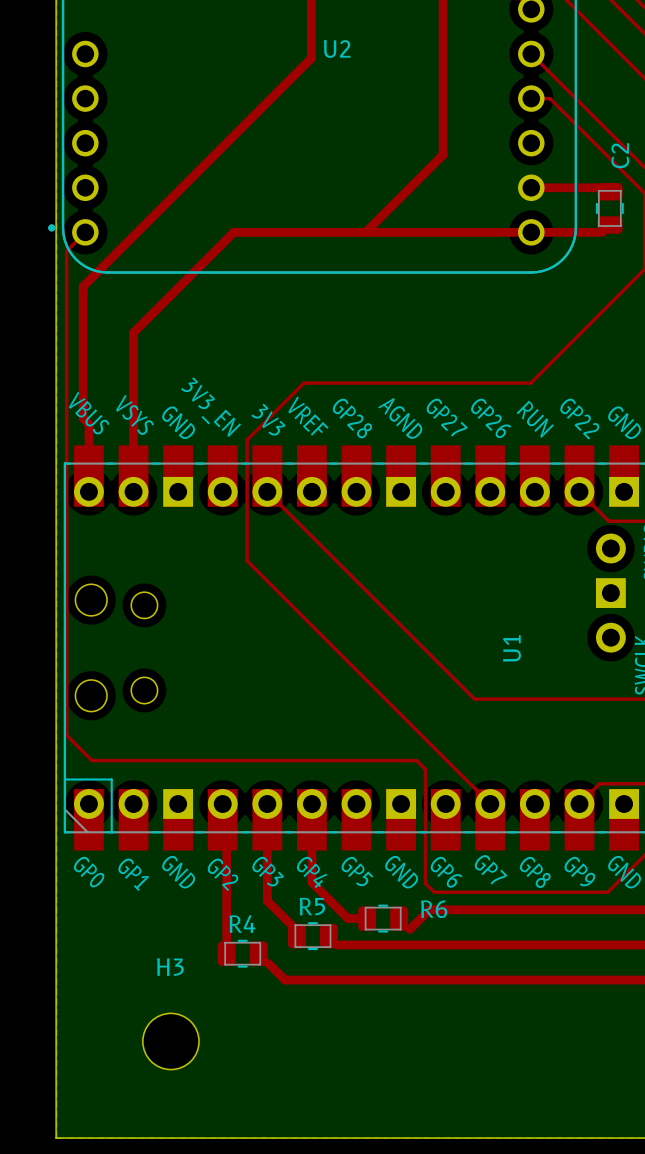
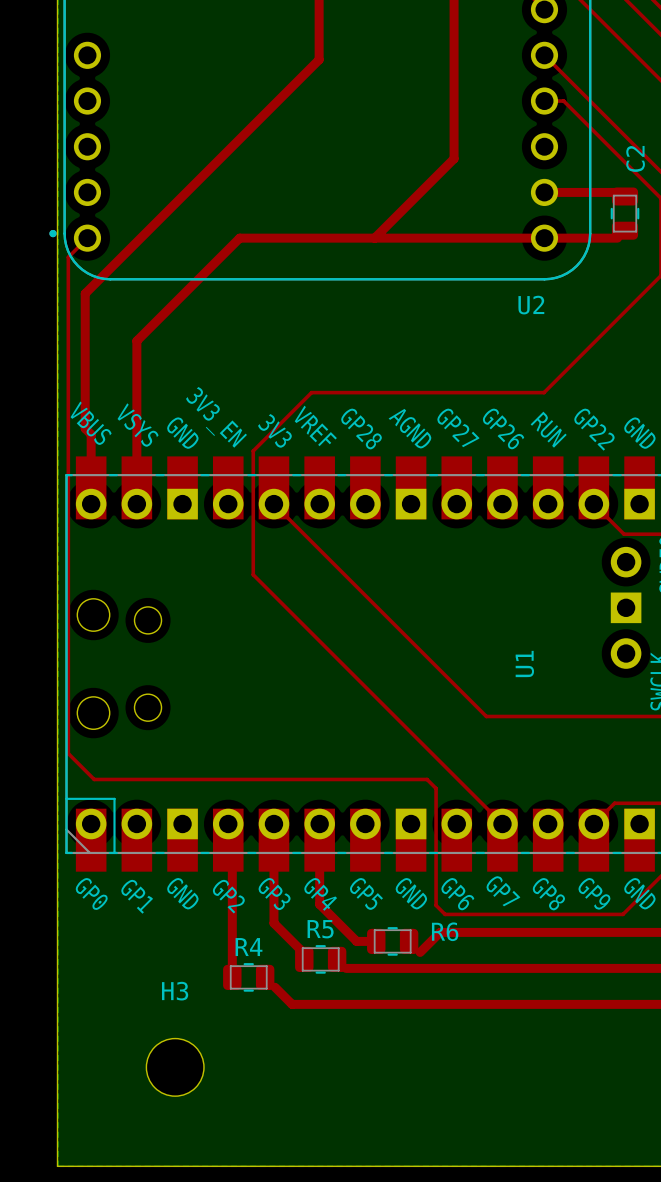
U2 name position: U2 (337, 48) -> U2 (531, 305)

